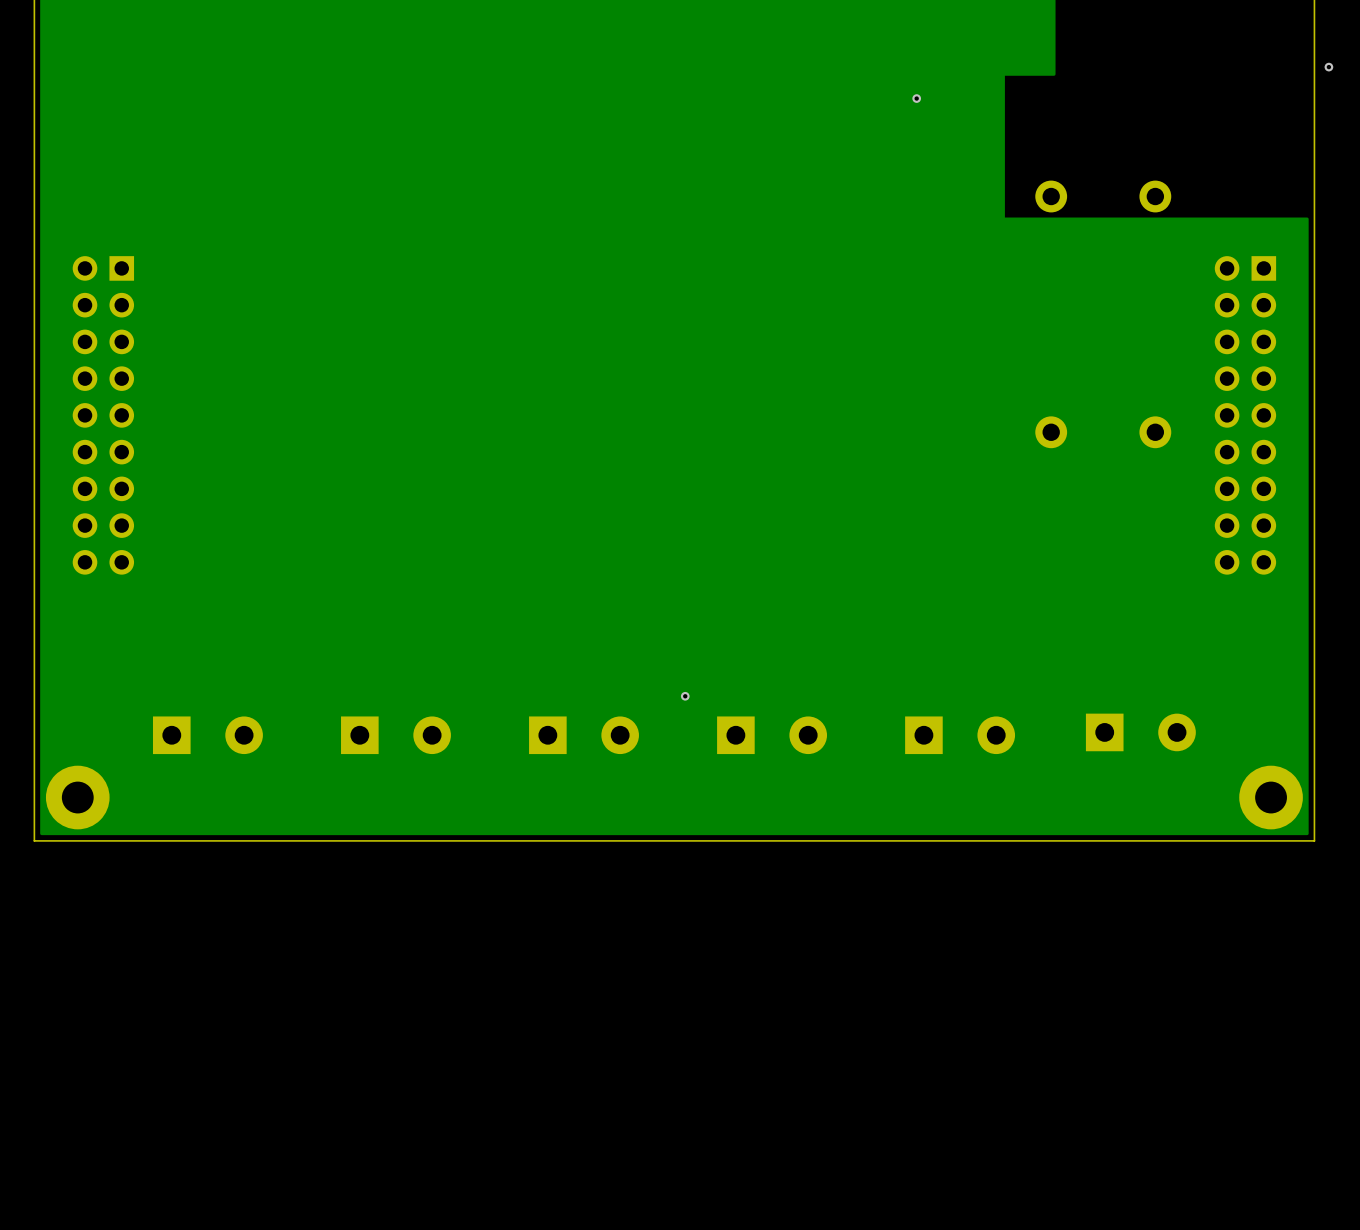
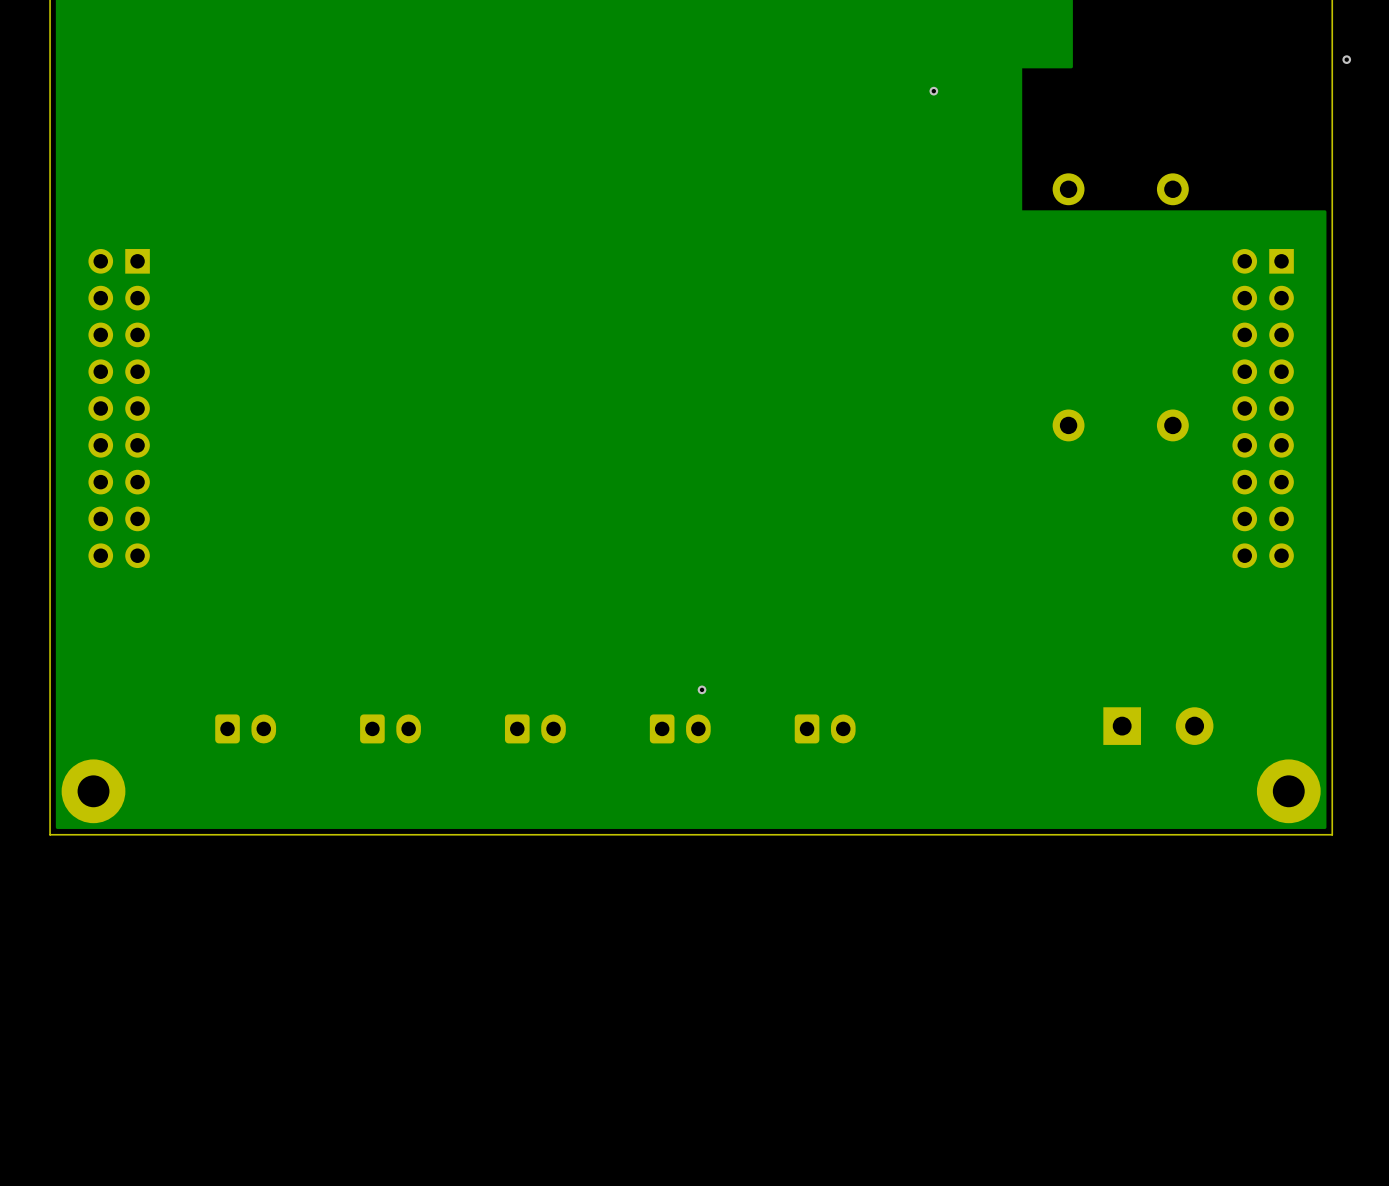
part: (207, 735) -> none
part: none -> (245, 728)
part: none -> (390, 728)
part: (395, 735) -> none
part: none -> (535, 728)
part: (584, 735) -> none
part: none -> (680, 728)
part: (772, 735) -> none
part: none -> (825, 728)
part: (960, 735) -> none

